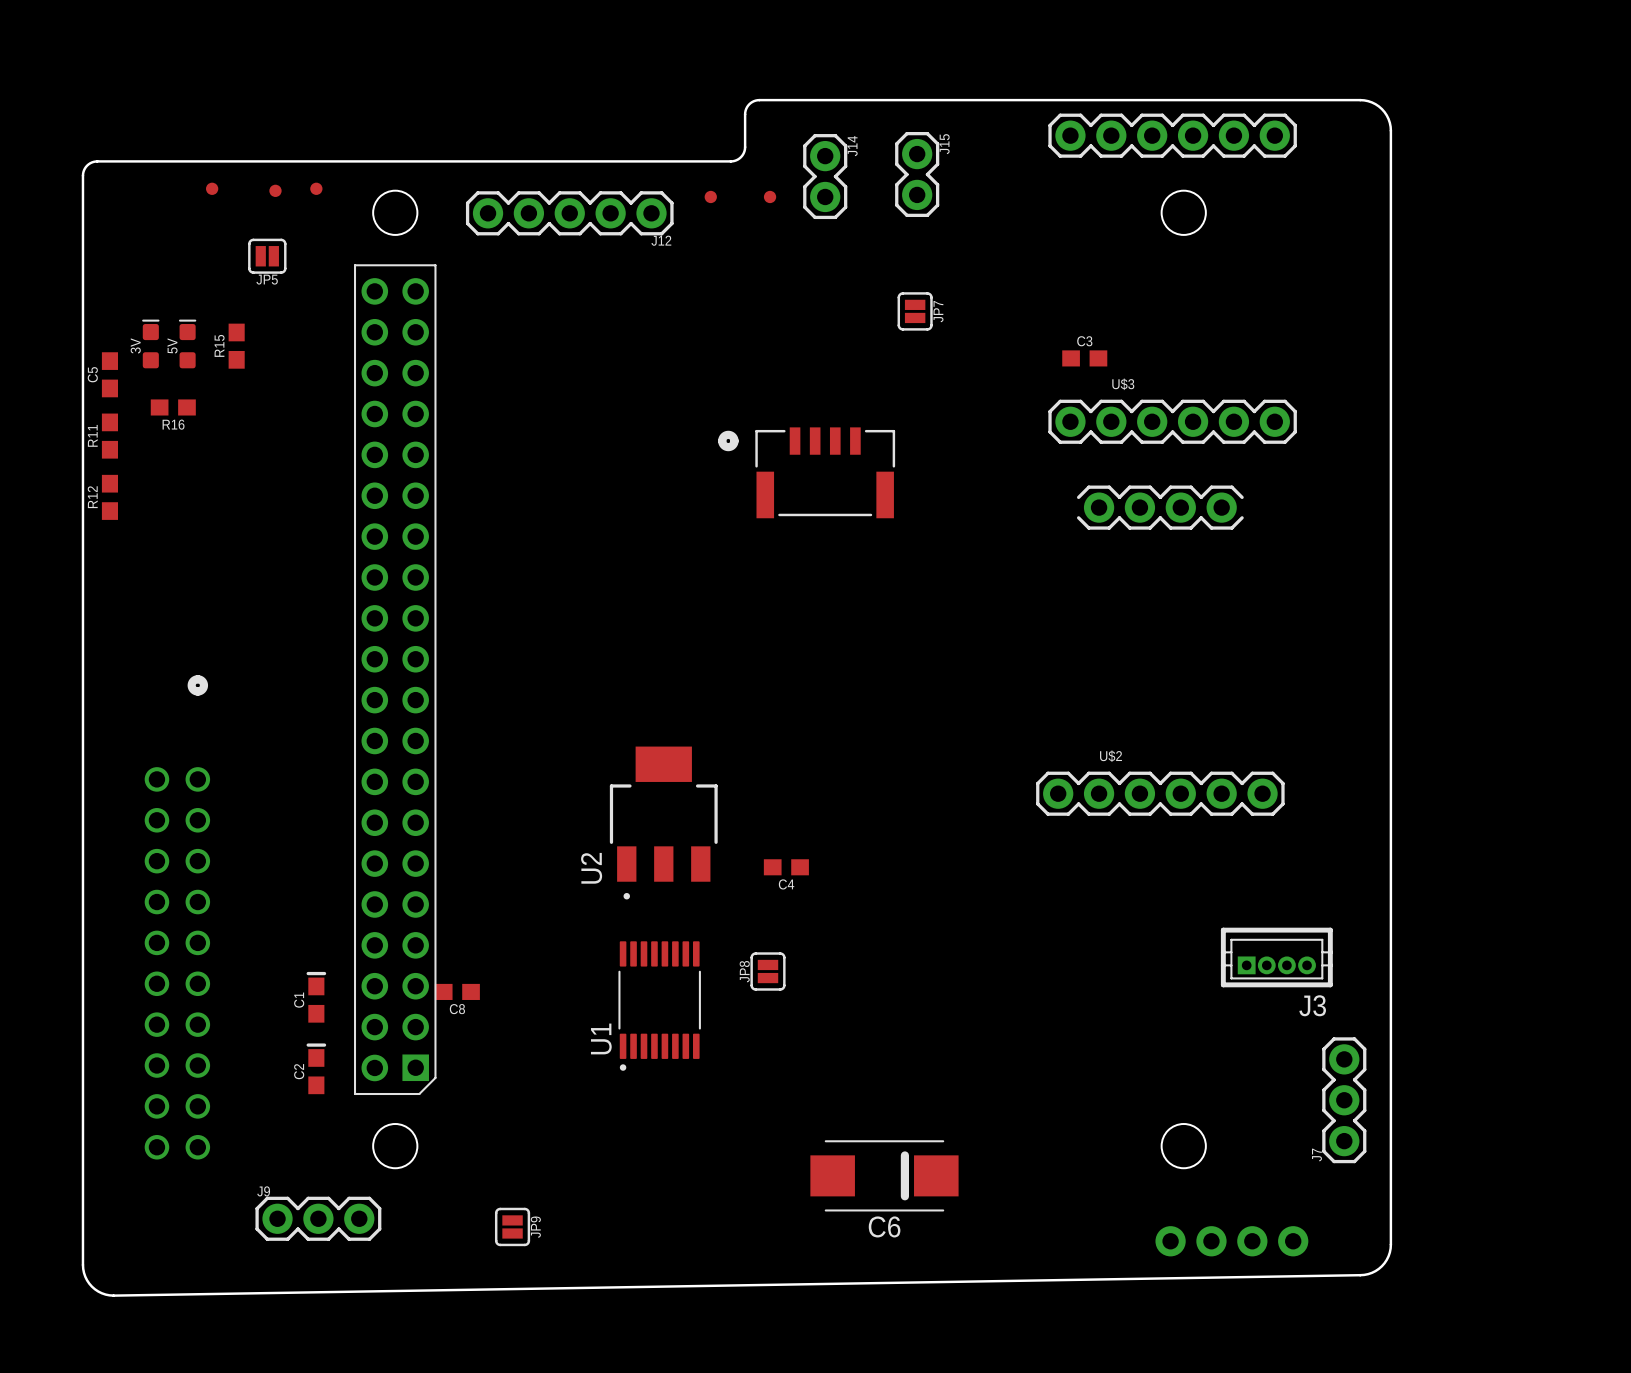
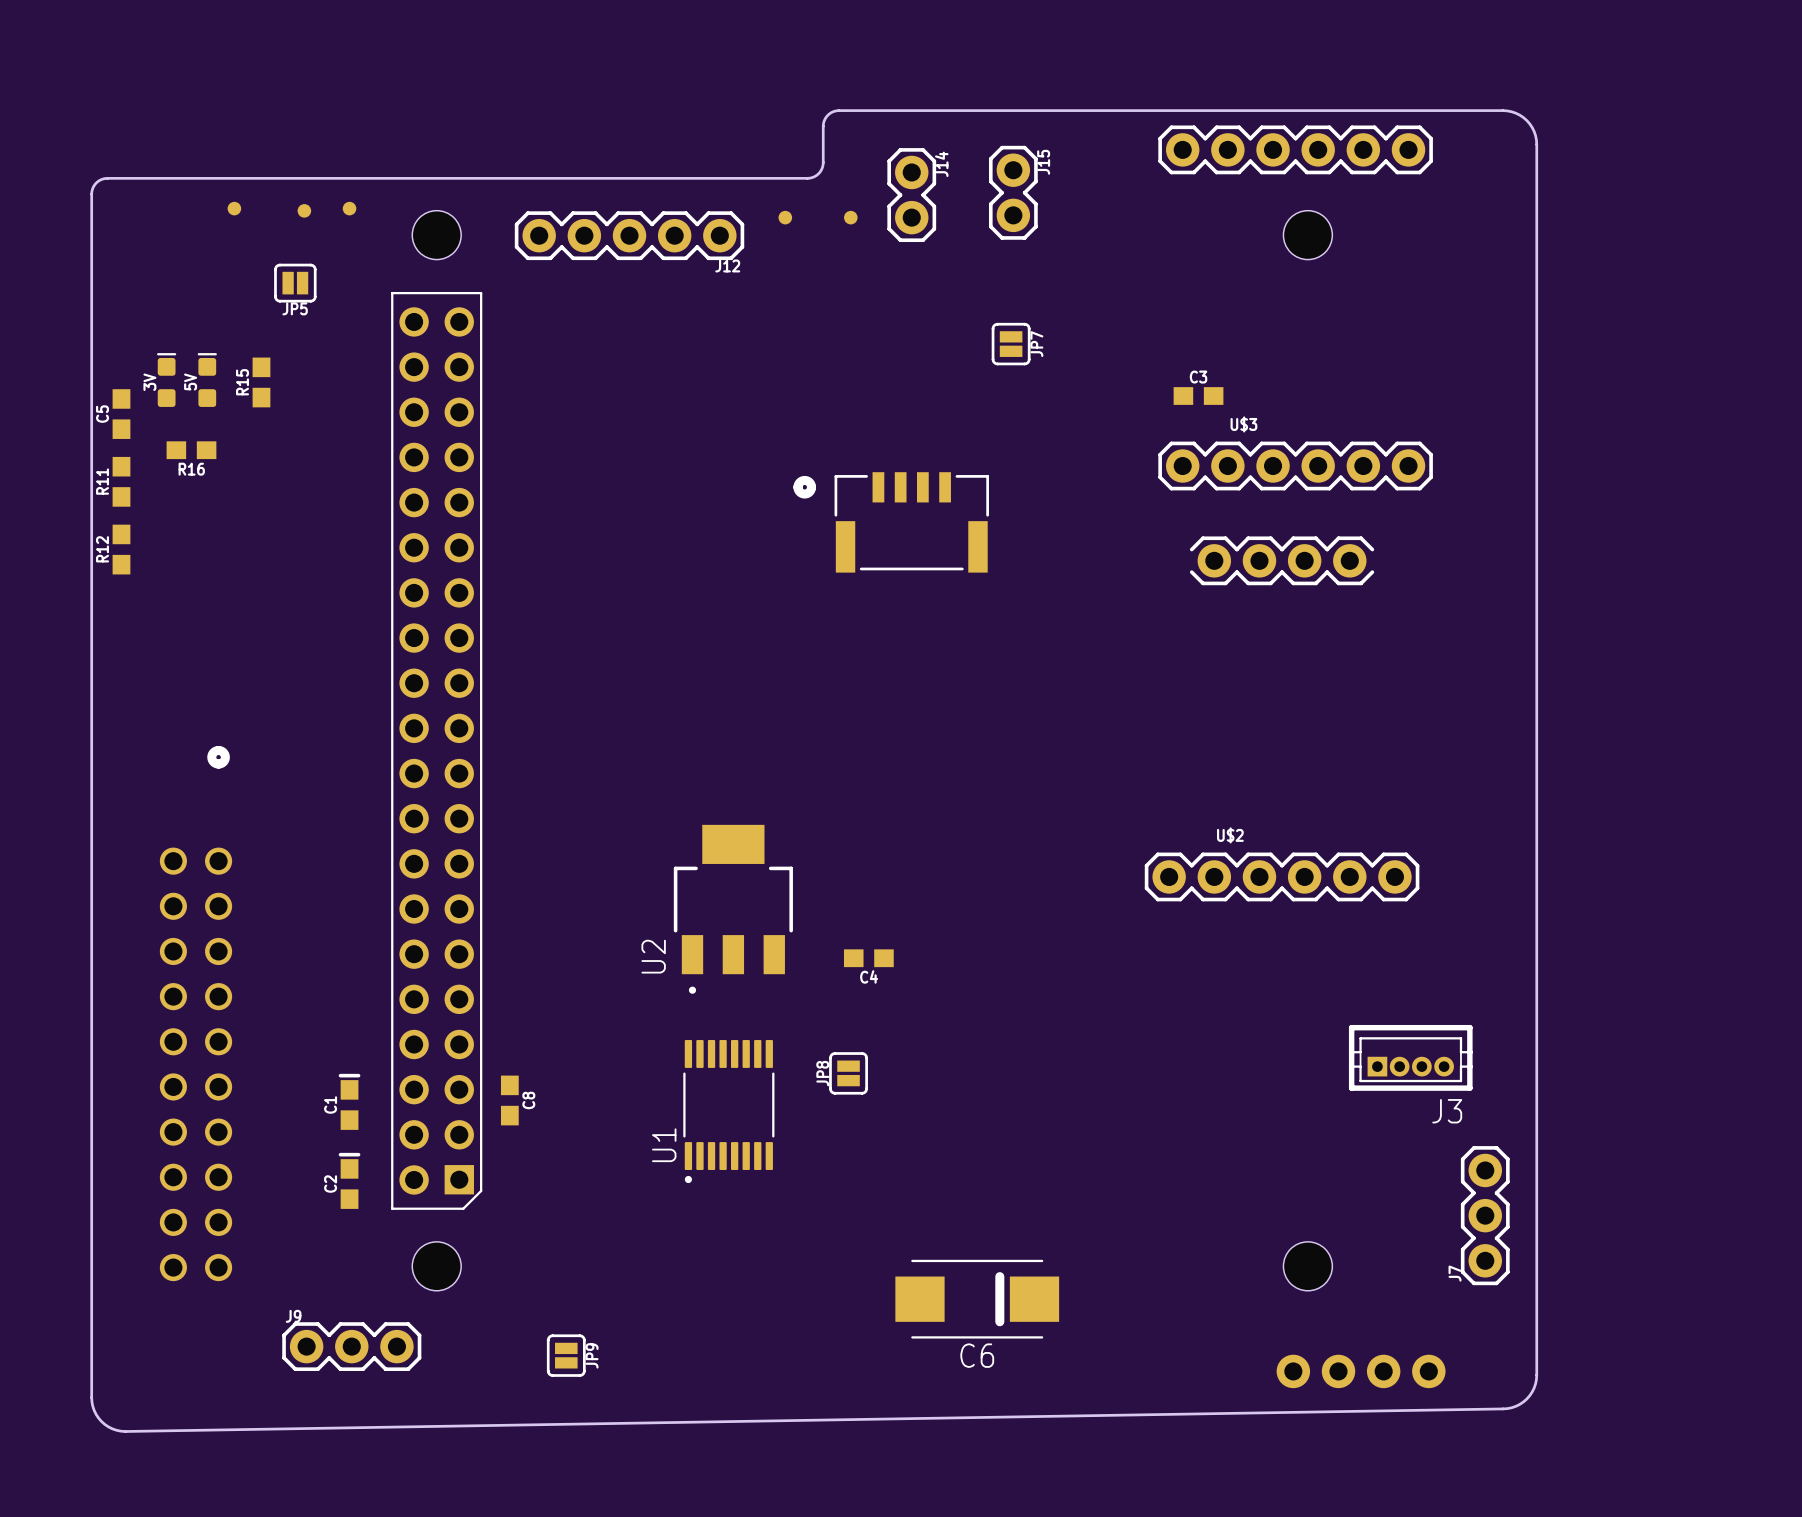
C8 rotation: 0° (457, 991) -> 90° clockwise (509, 1100)

